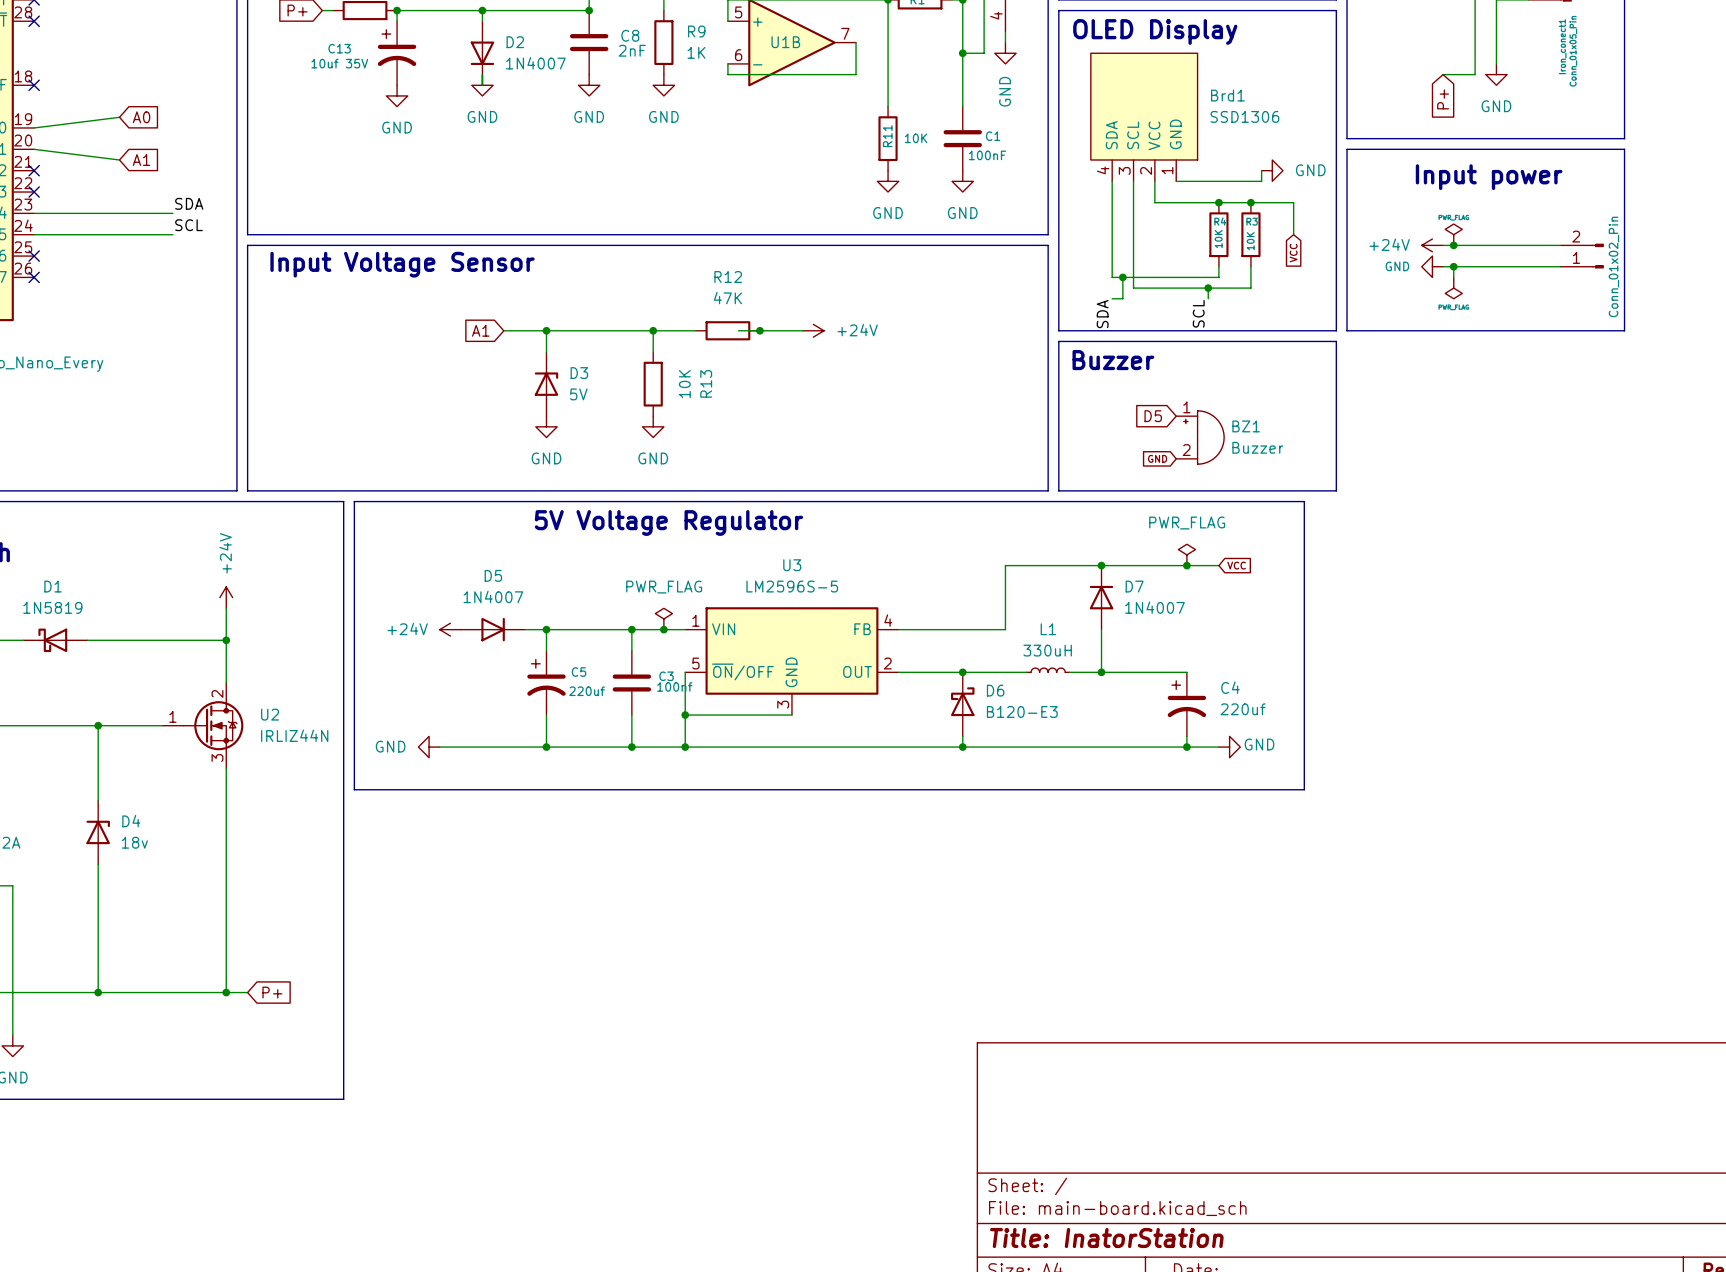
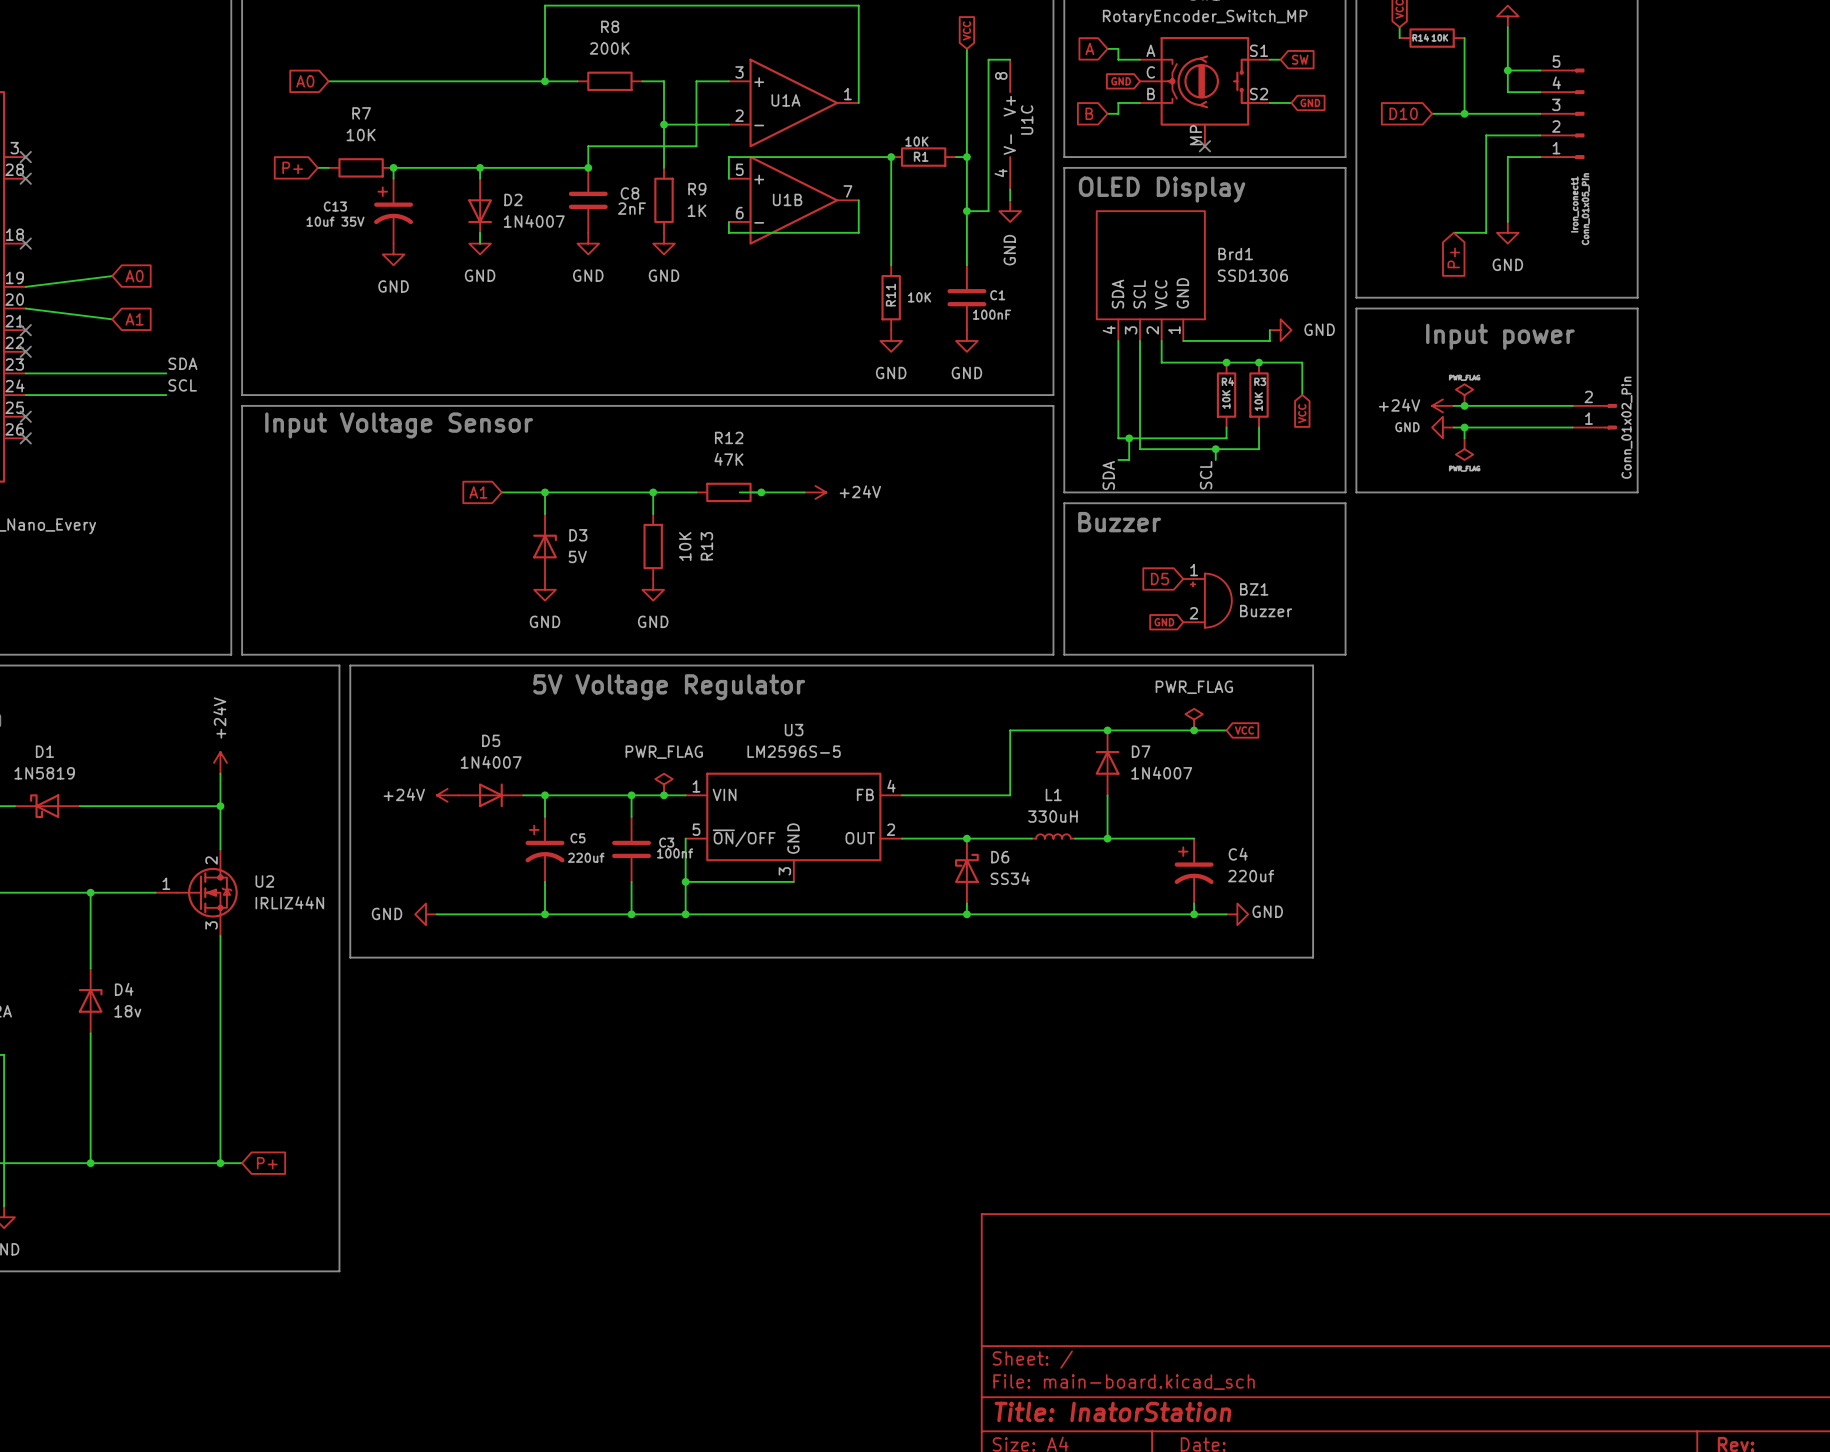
D6 value: B120-E3 (1022, 711) -> SS34 (1010, 878)

